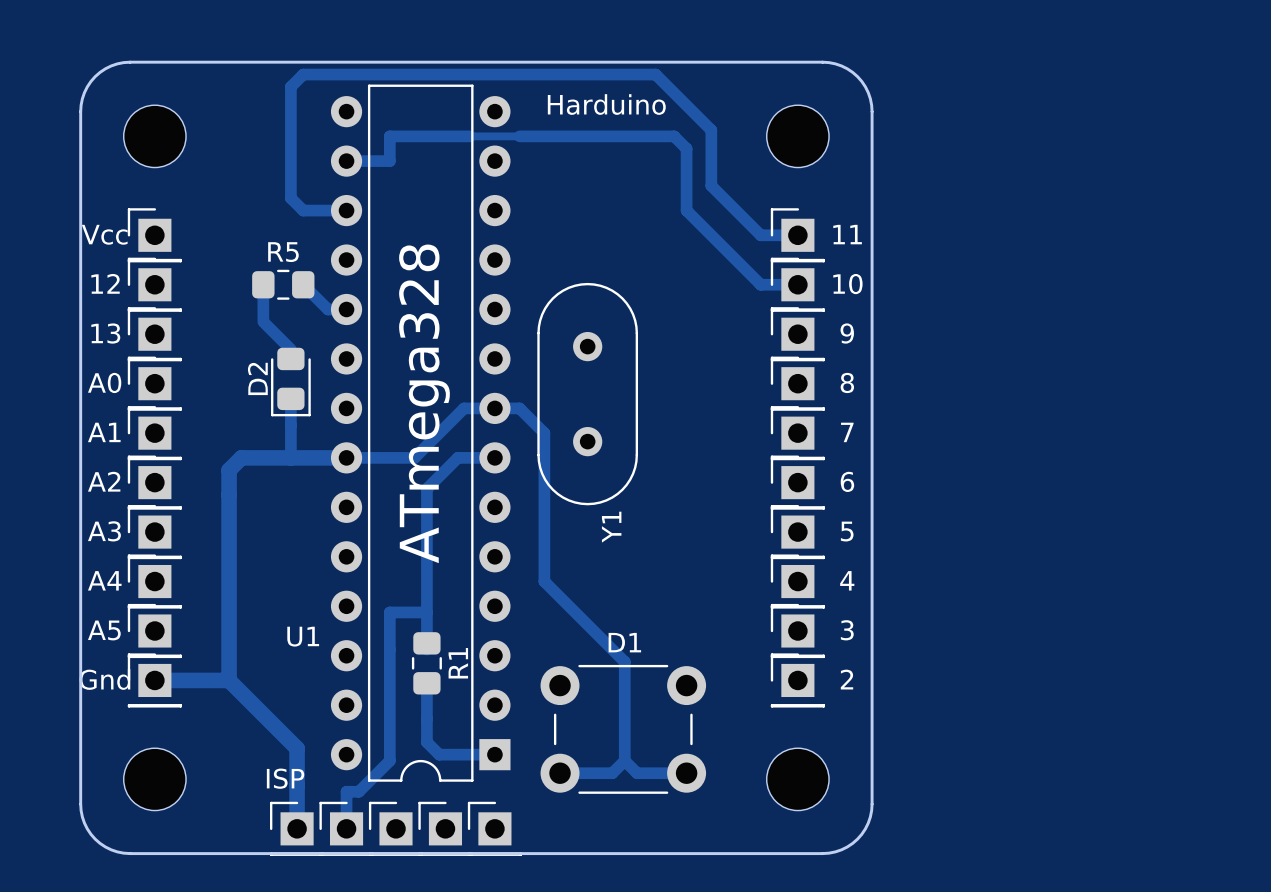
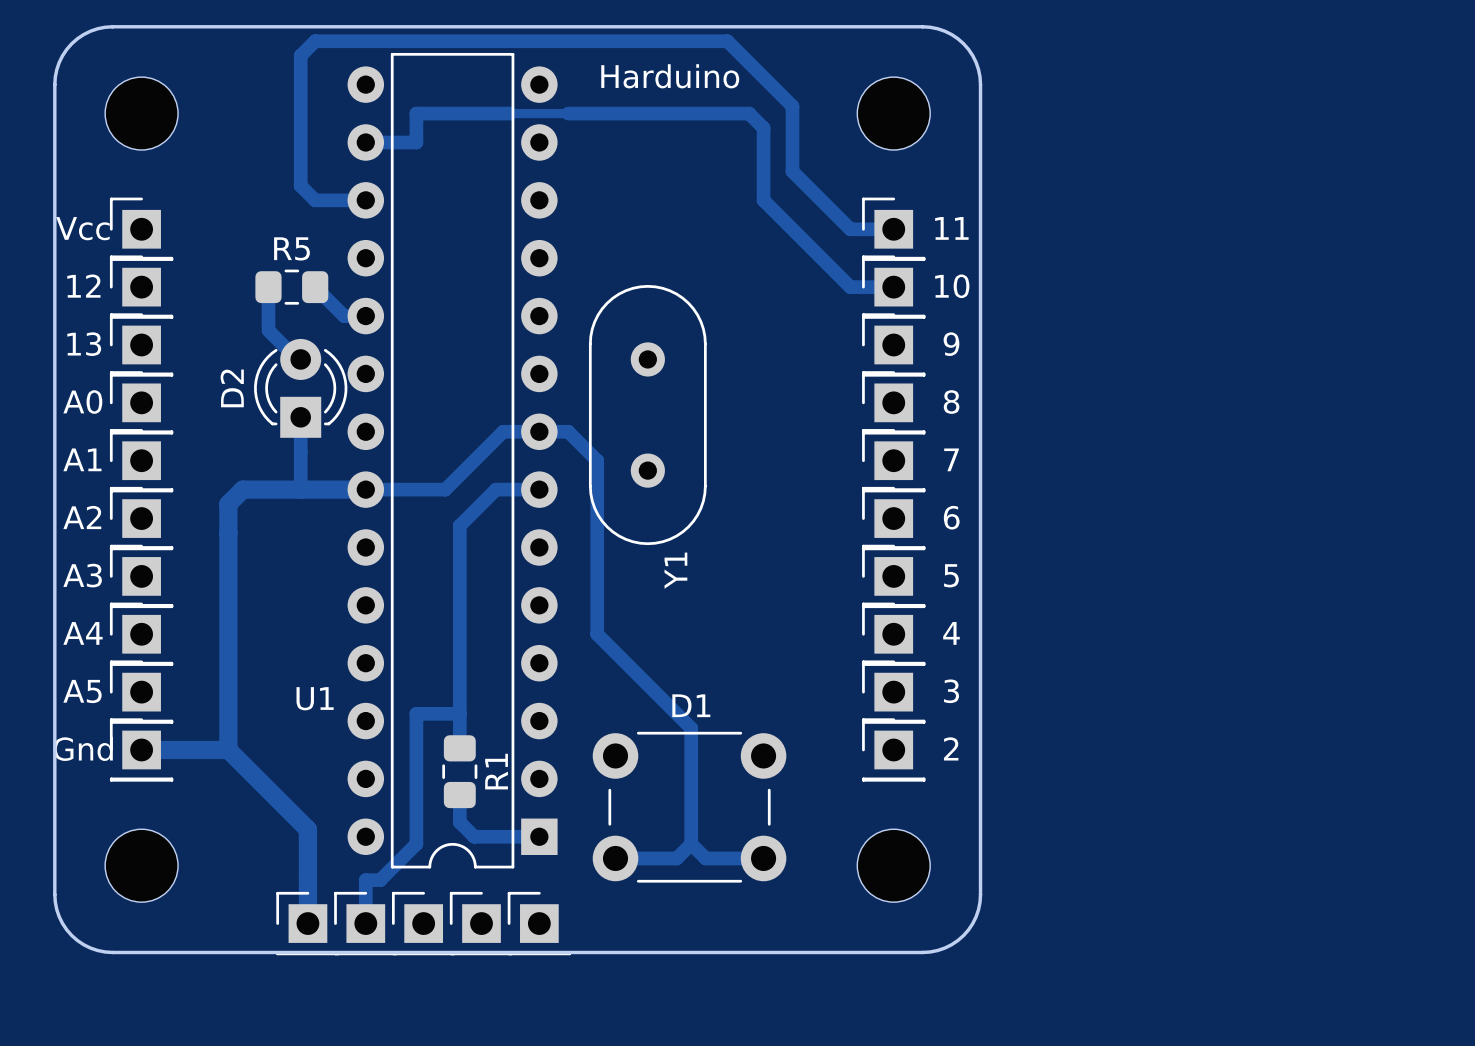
D2 footprint: [271, 347, 311, 417] -> [254, 338, 348, 438]
text: ATmega328 (424, 403) -> none
track: (426, 612) (389, 612) (389, 649) -> (459, 748) (459, 713) (416, 713)
R1 position: (426, 663) -> (459, 771)
track: (426, 683) (426, 718) -> none
text: ISP (285, 778) -> none

